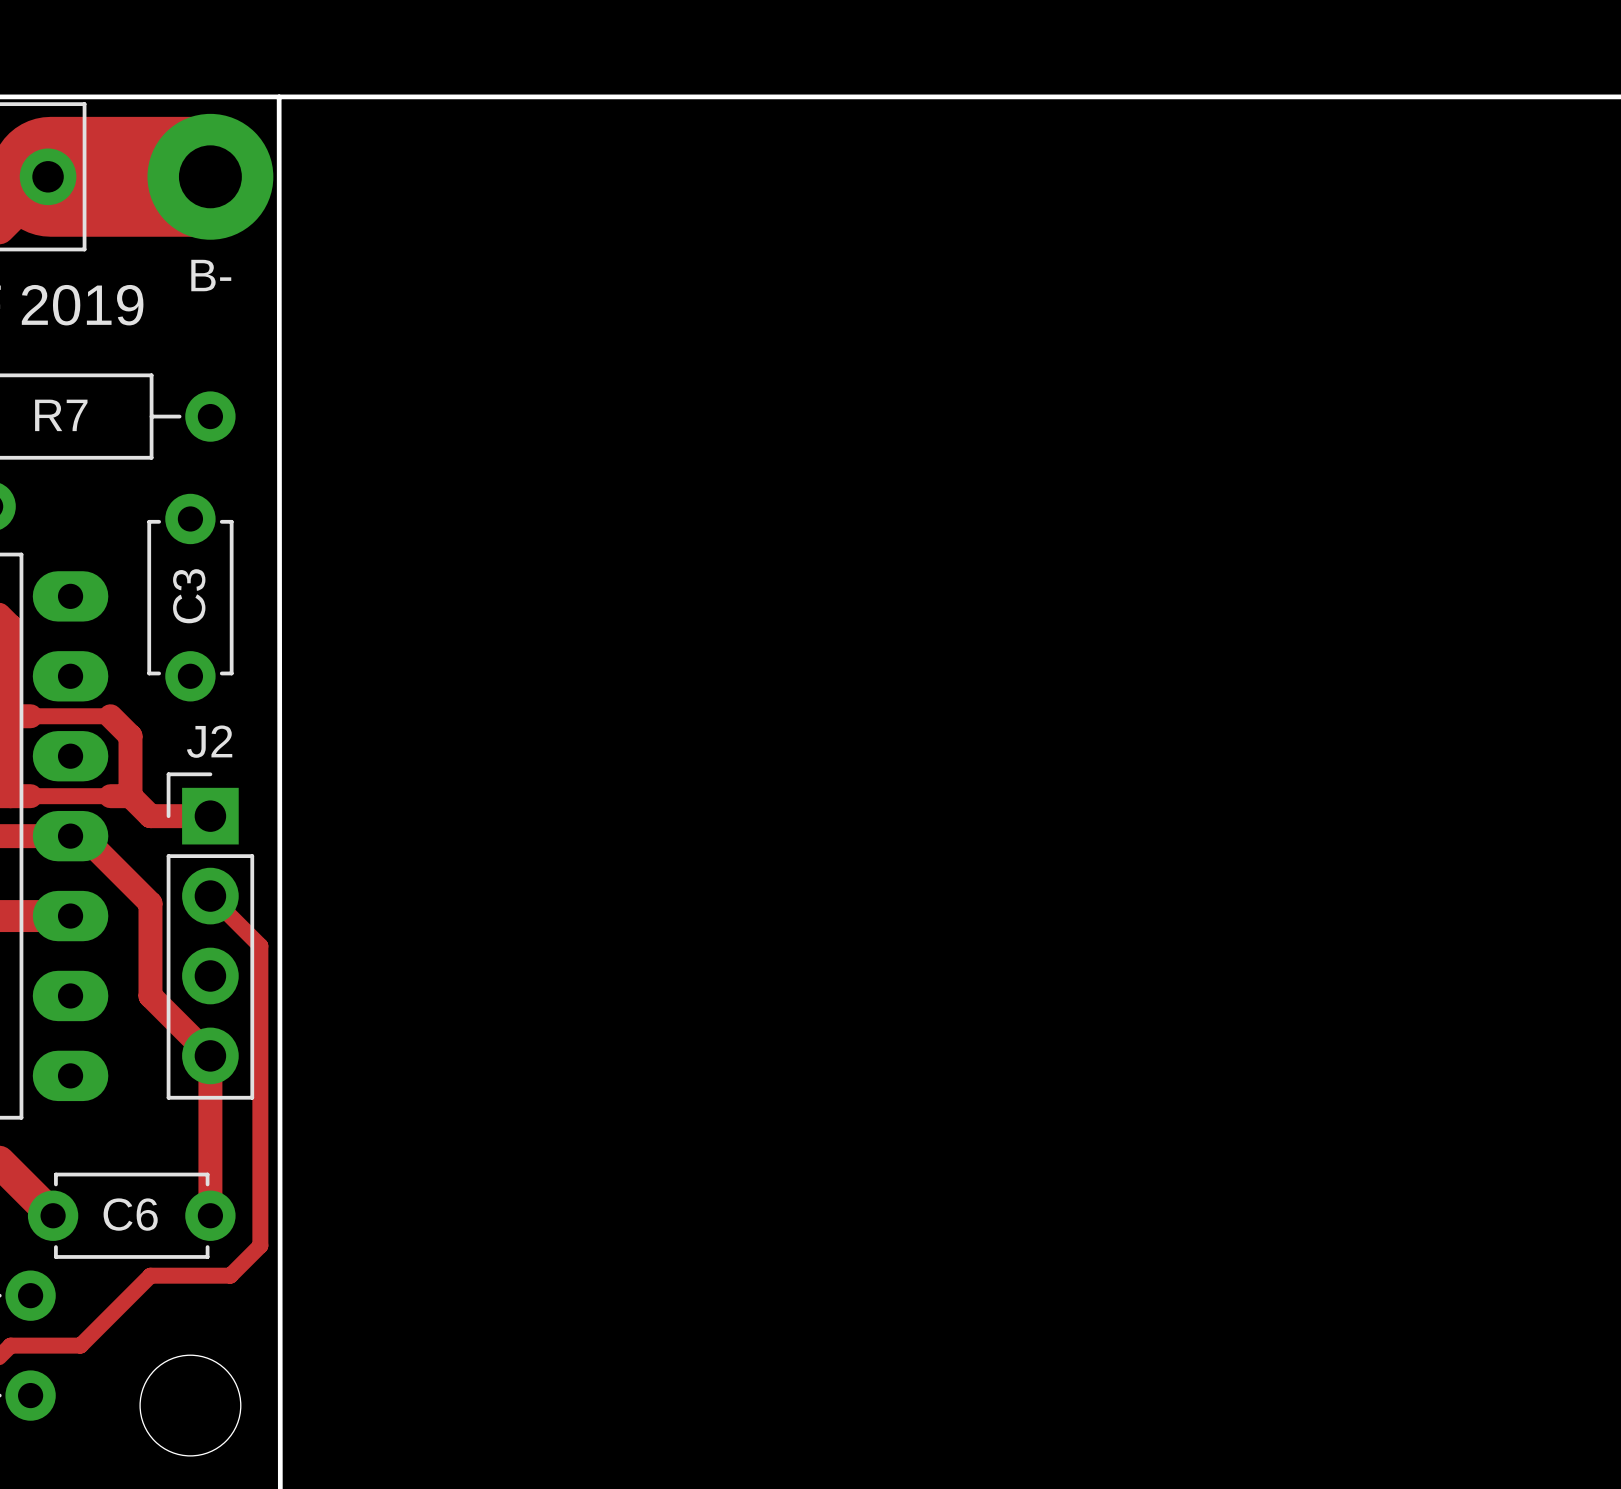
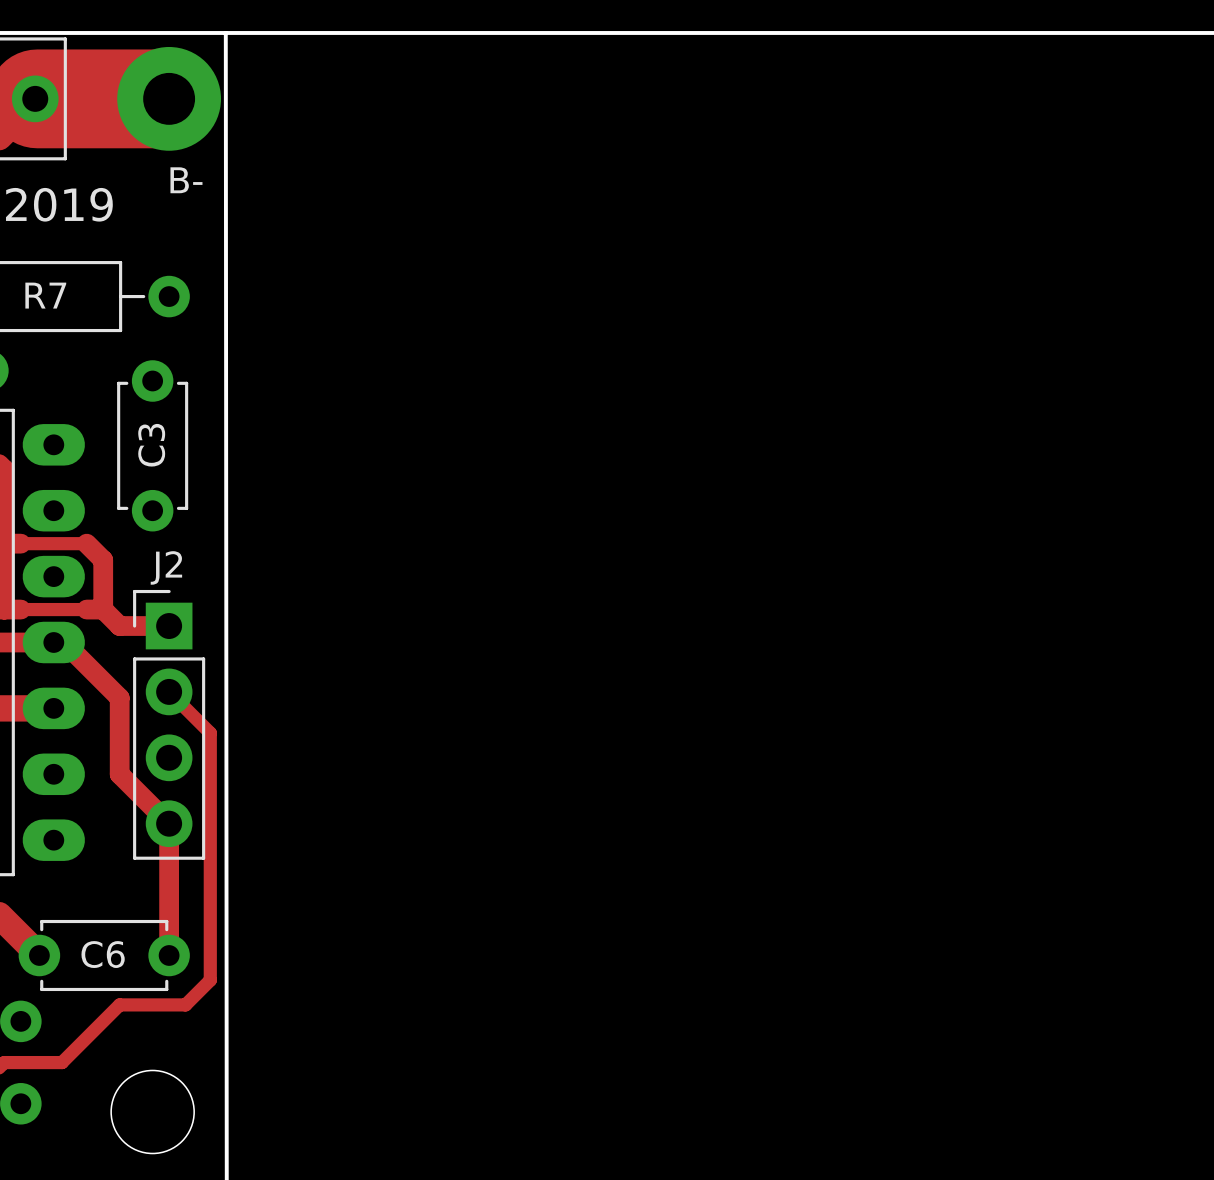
text: B- (211, 275) -> none
B- name: none -> B- (186, 180)

